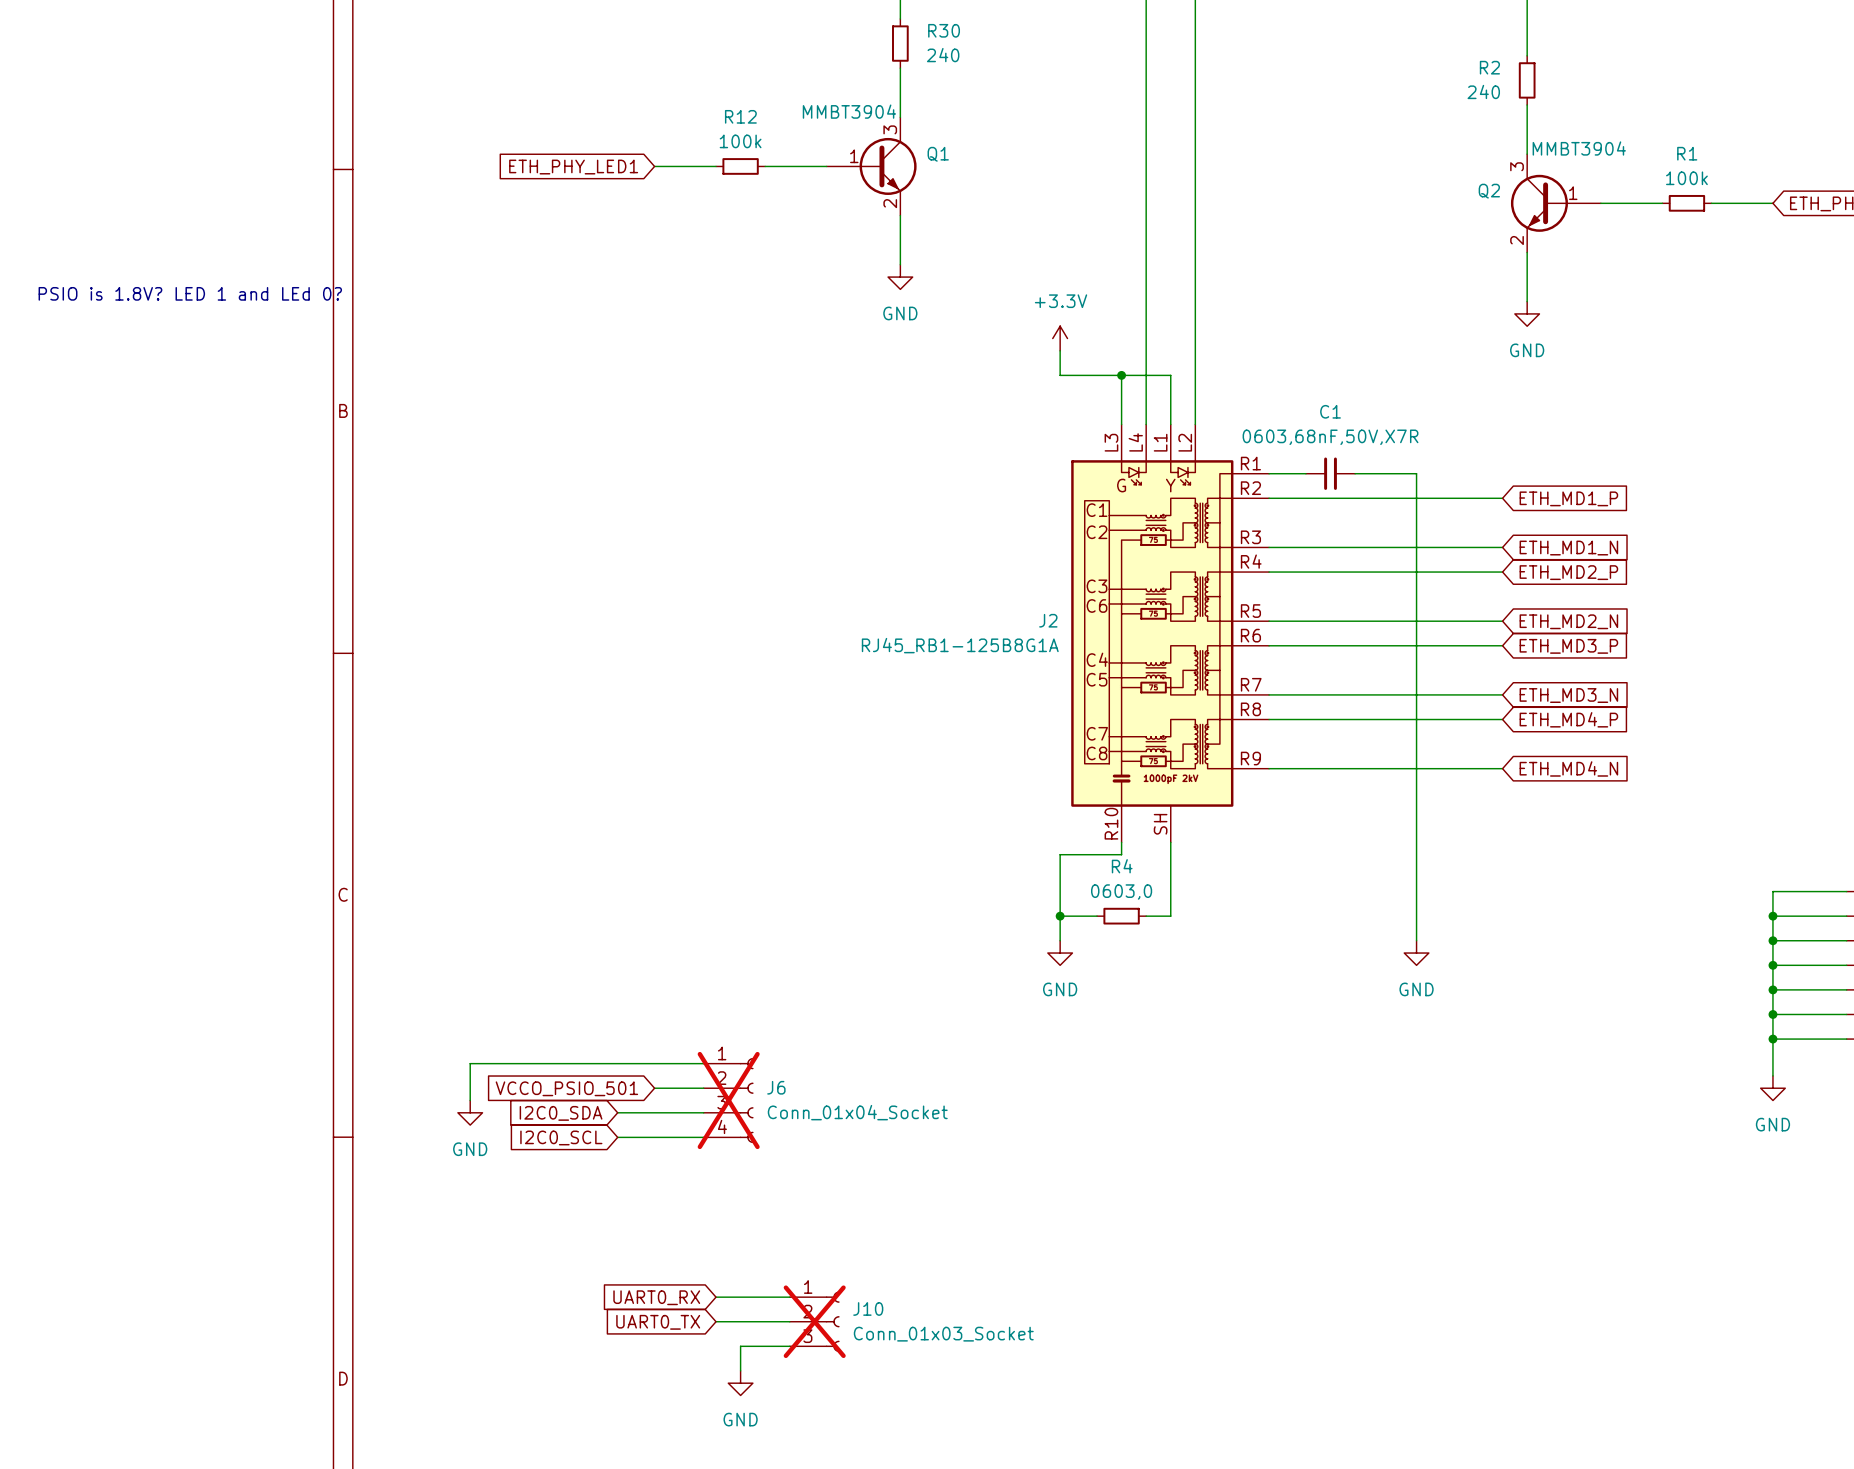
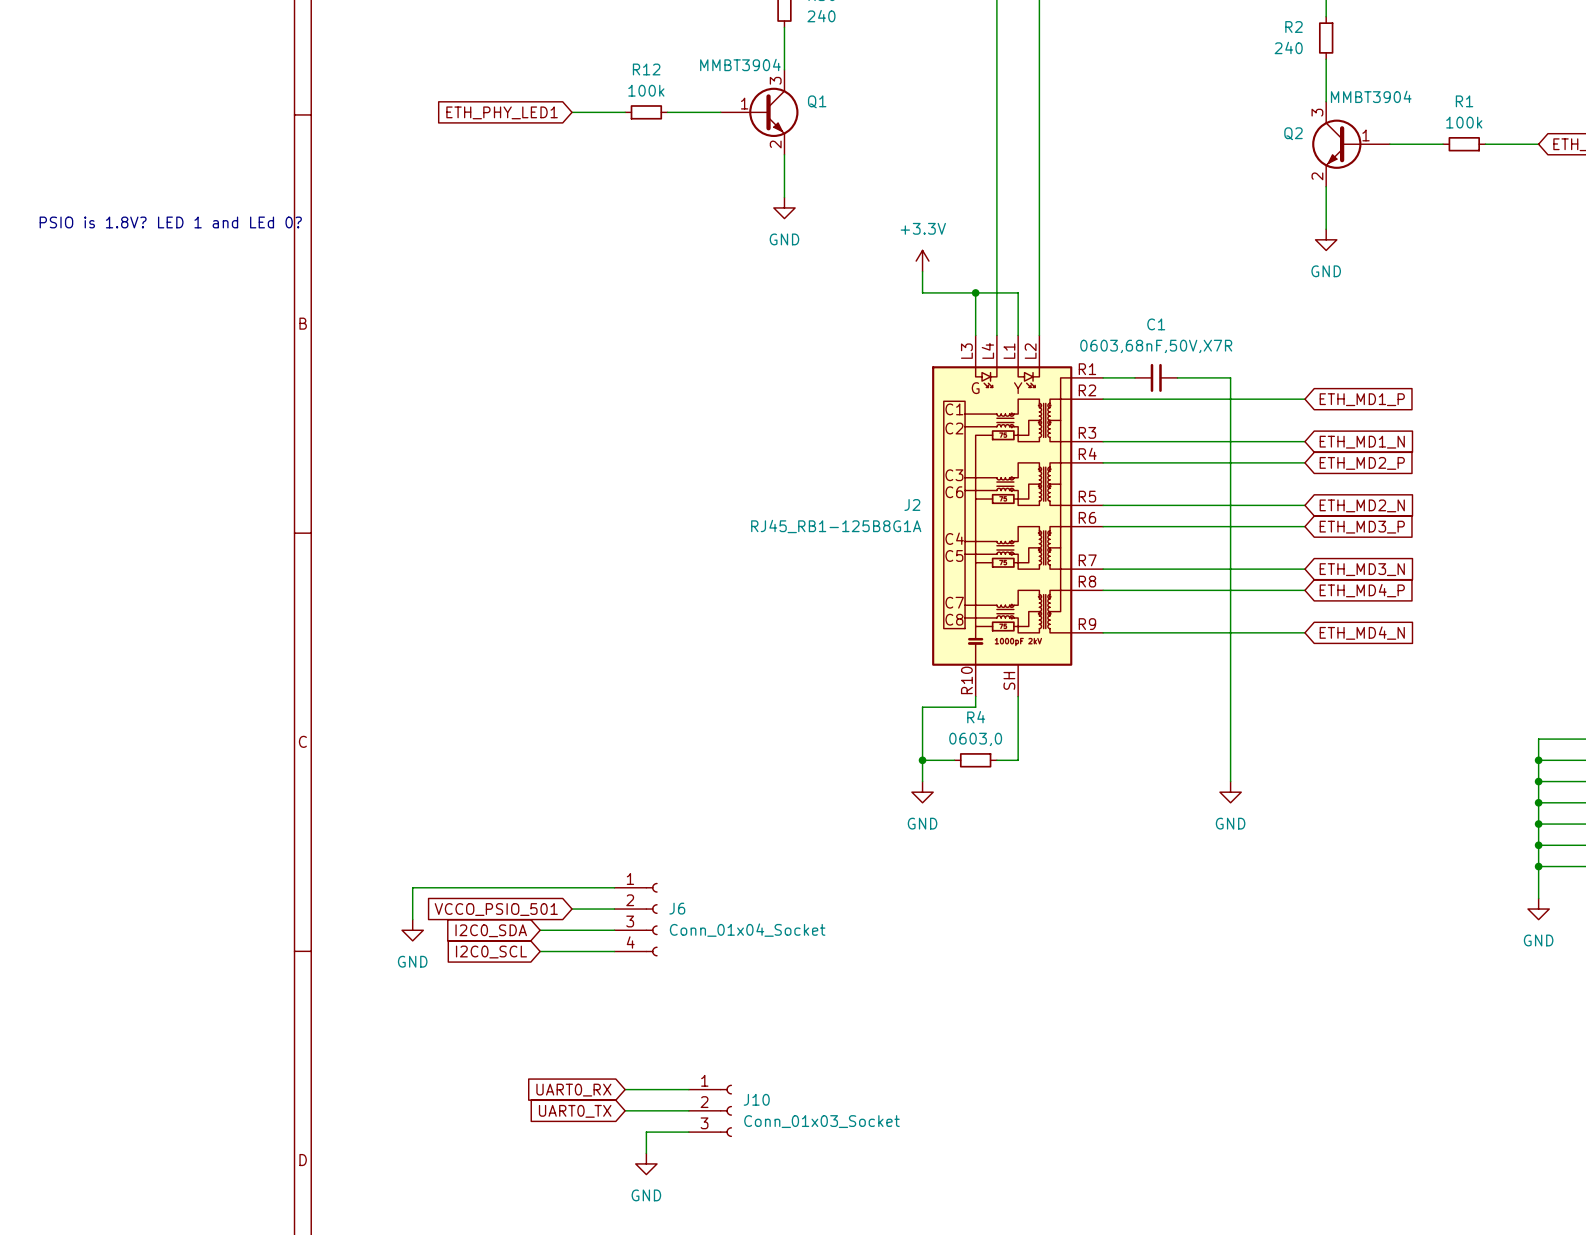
J6 do-not-place cross: (728, 1100) -> none
J10 do-not-place cross: (814, 1321) -> none

